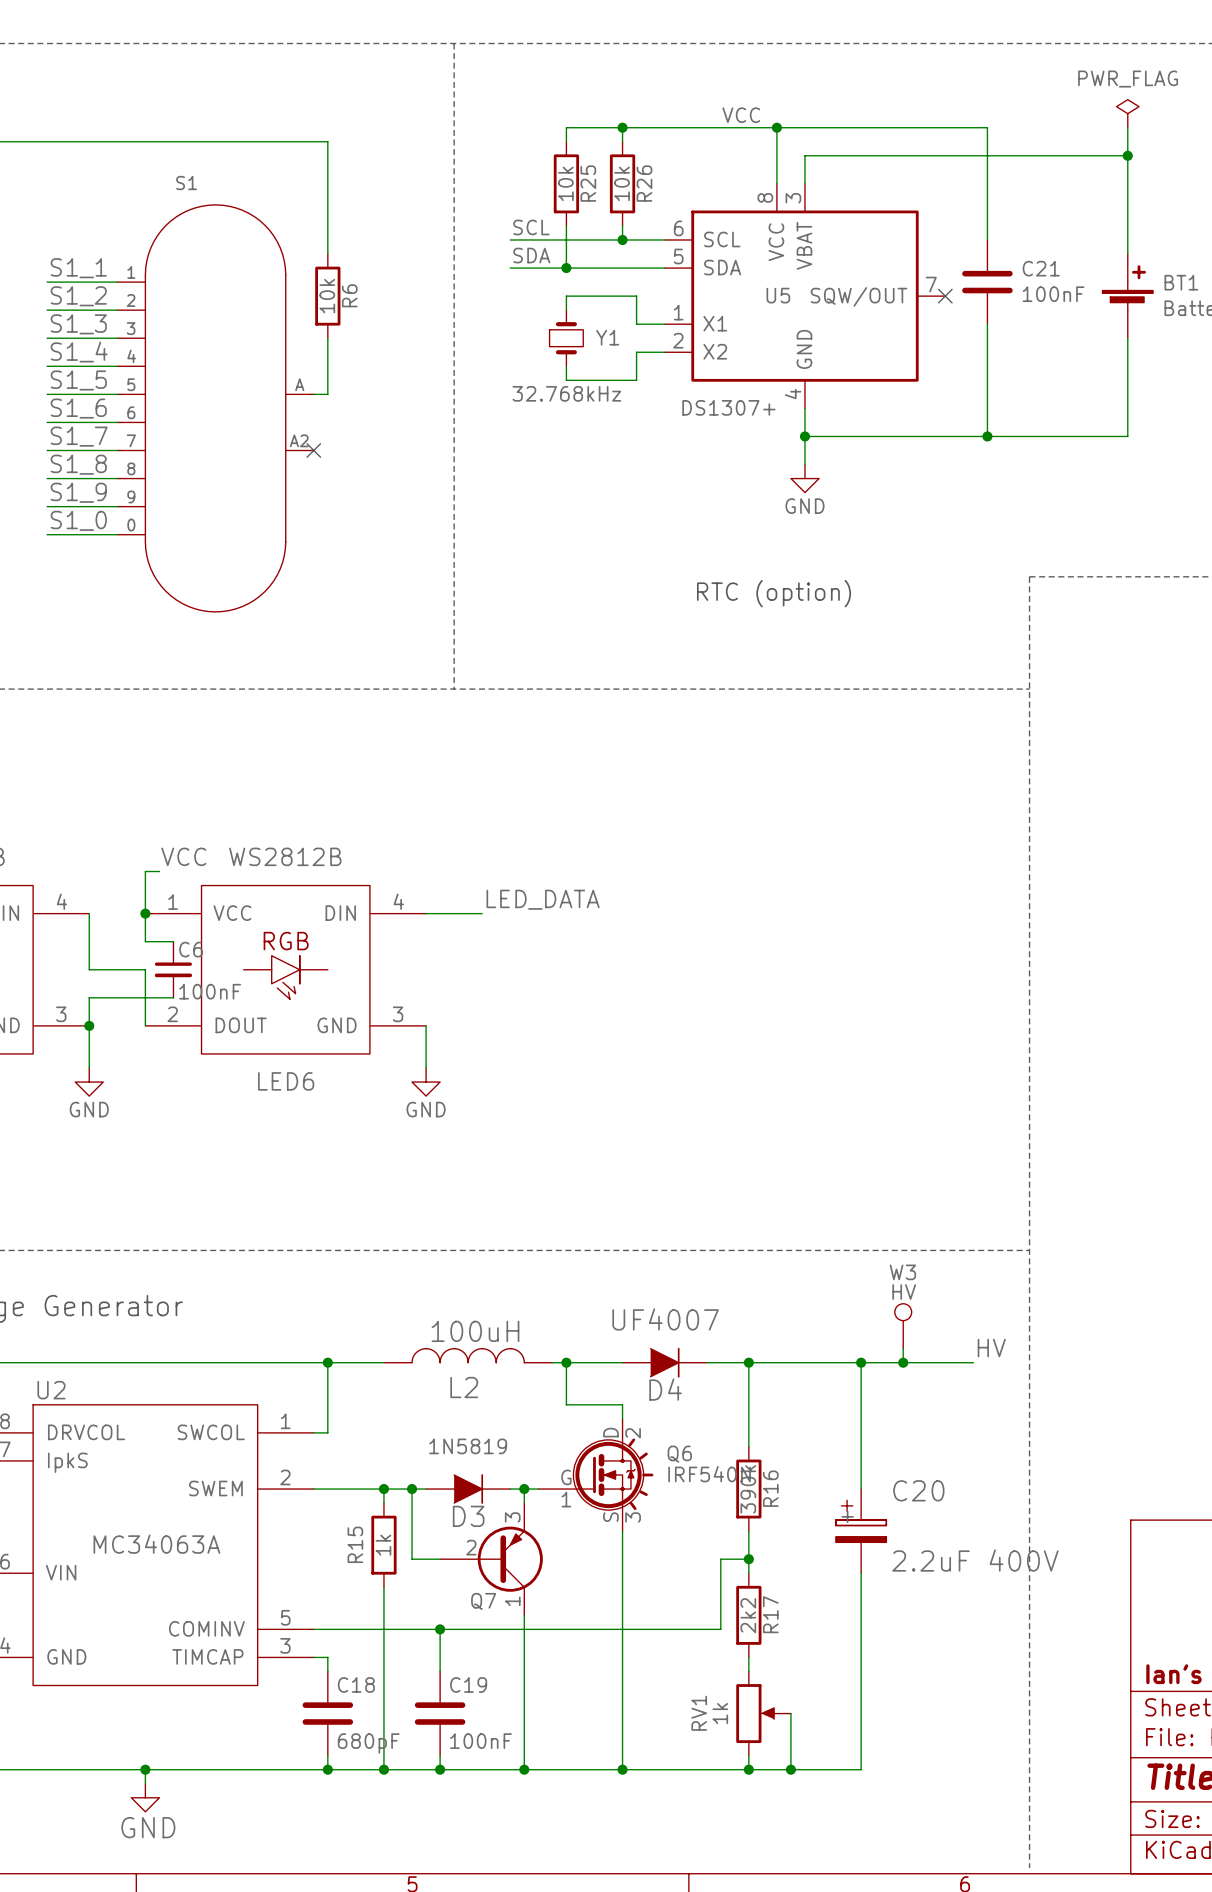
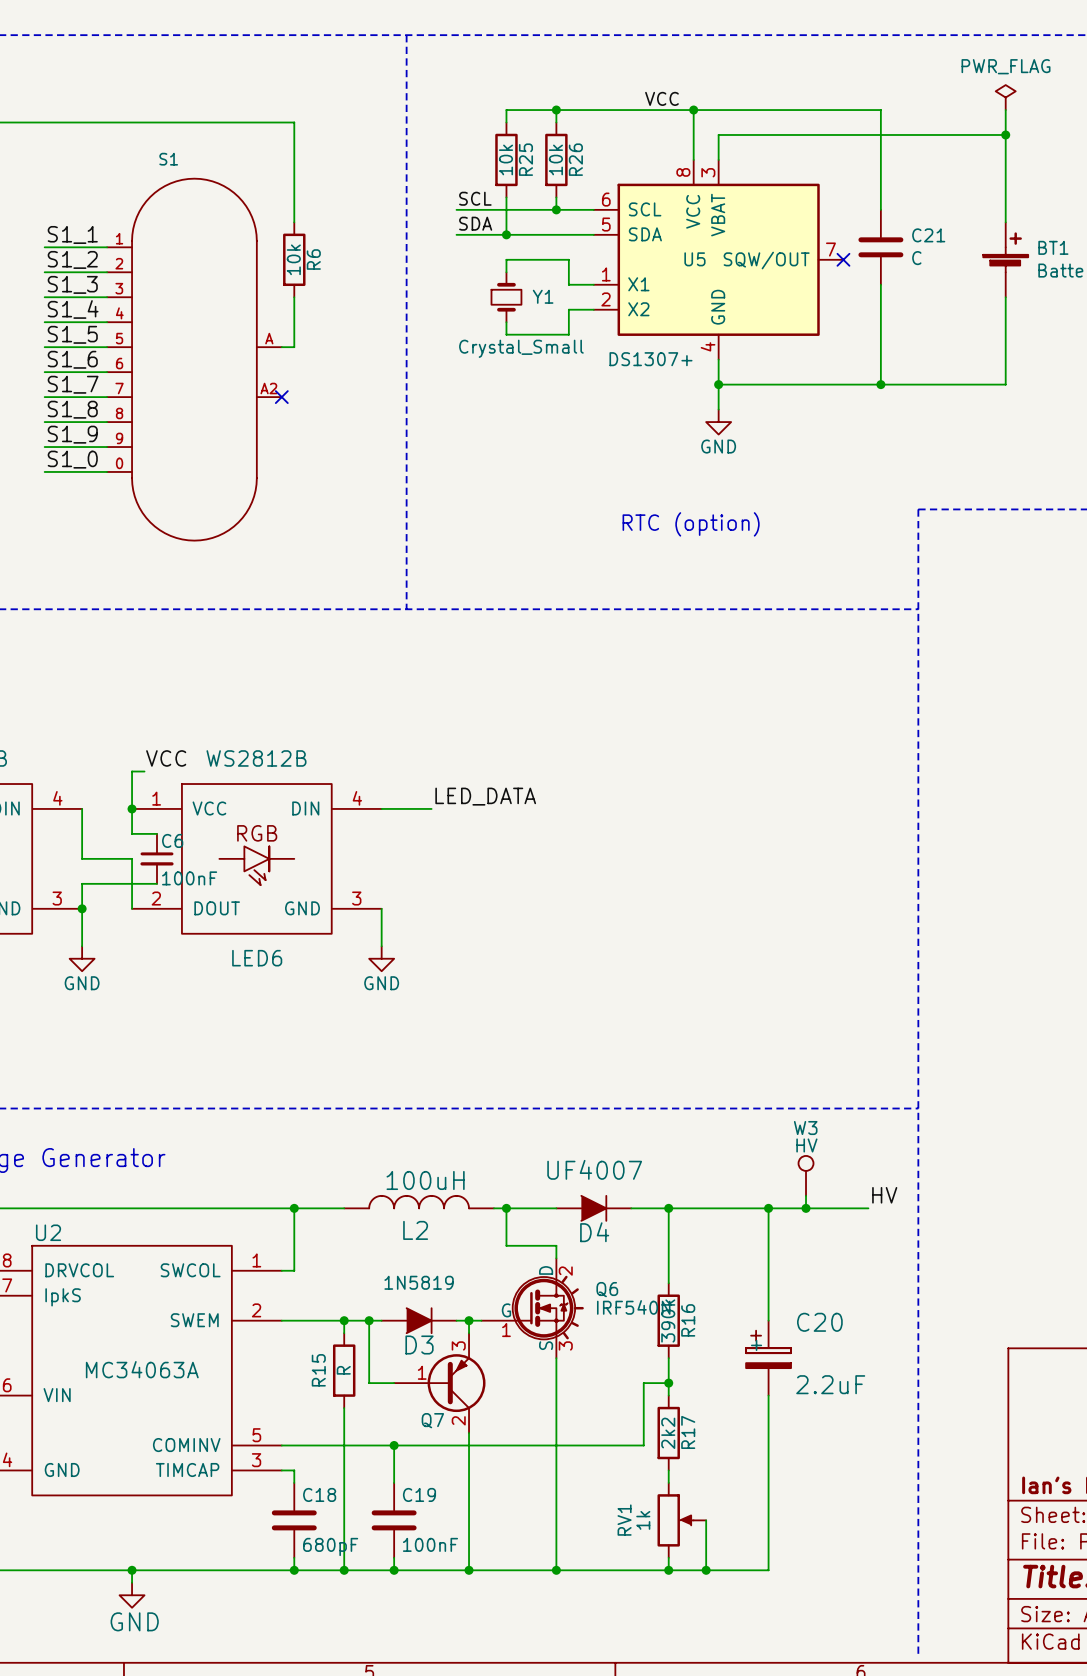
C21 value: 100nF (1053, 294) -> C (916, 258)
Y1 value: 32.768kHz (566, 393) -> Crystal_Small (521, 348)
R15 value: 1k (383, 1545) -> R (343, 1370)
Q7 pin number: 2 (471, 1547) -> 1 (422, 1372)
C20 value: 2.2uF 400V (975, 1560) -> 2.2uF (830, 1384)
Q7 pin number: 1 (512, 1601) -> 2 (458, 1420)

